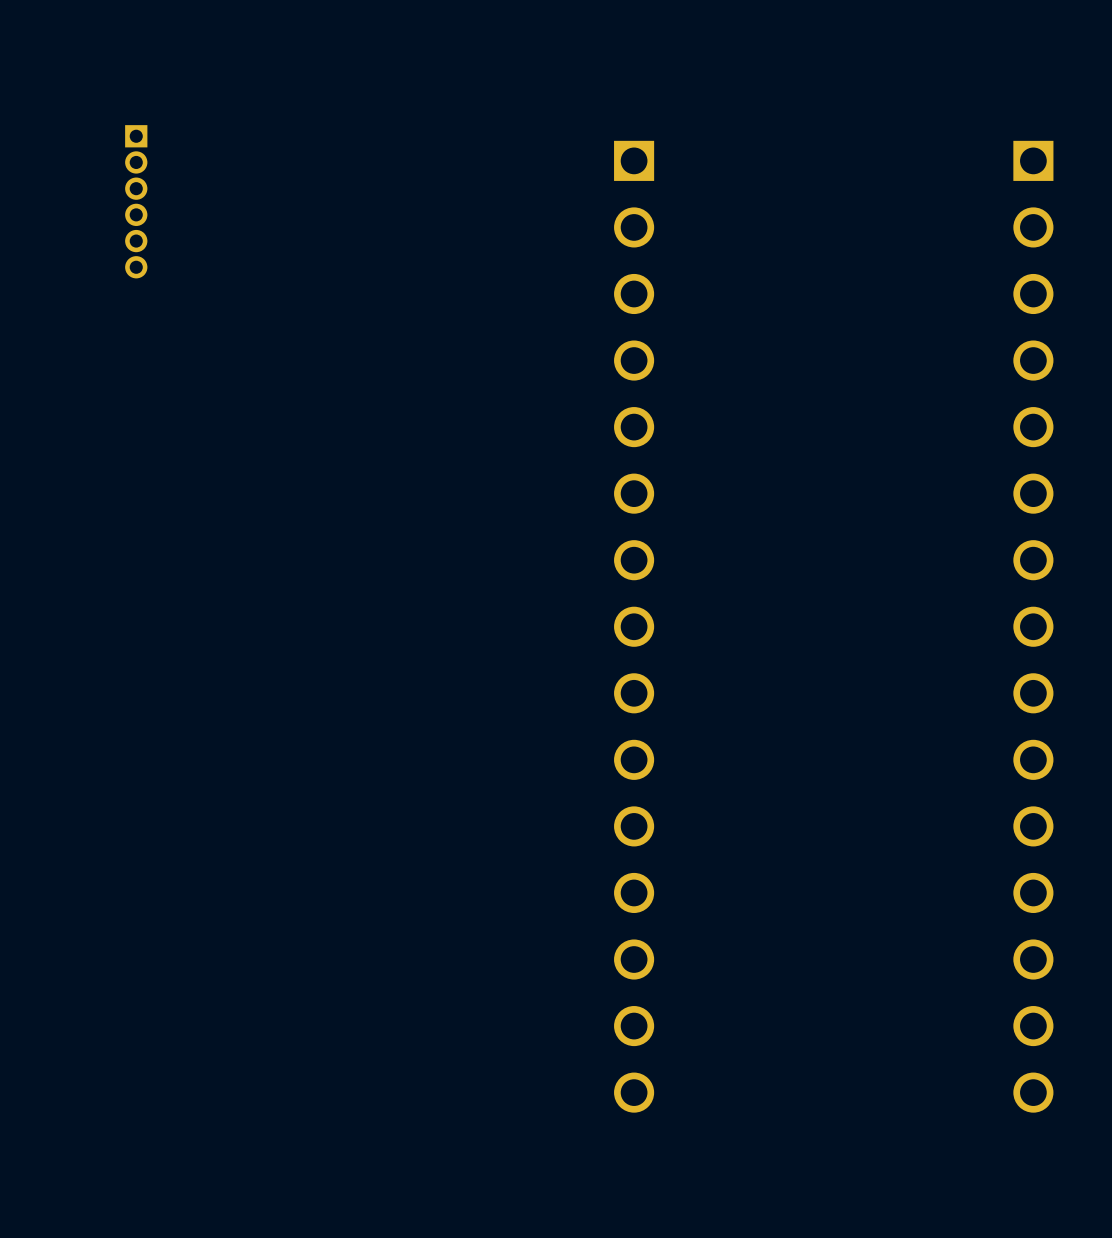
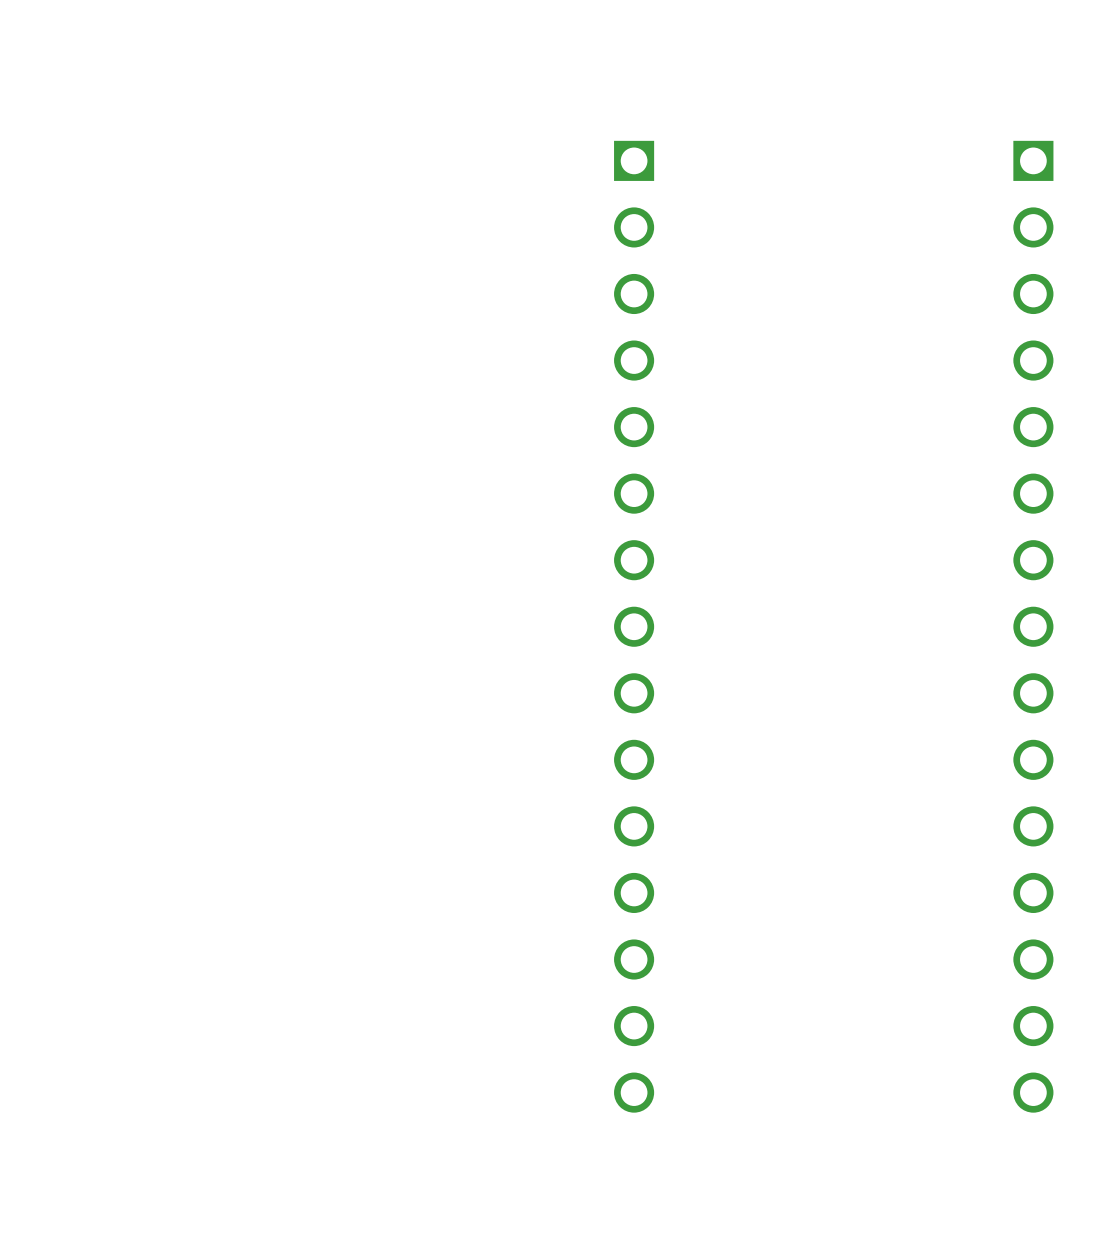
part: (136, 201) -> none

